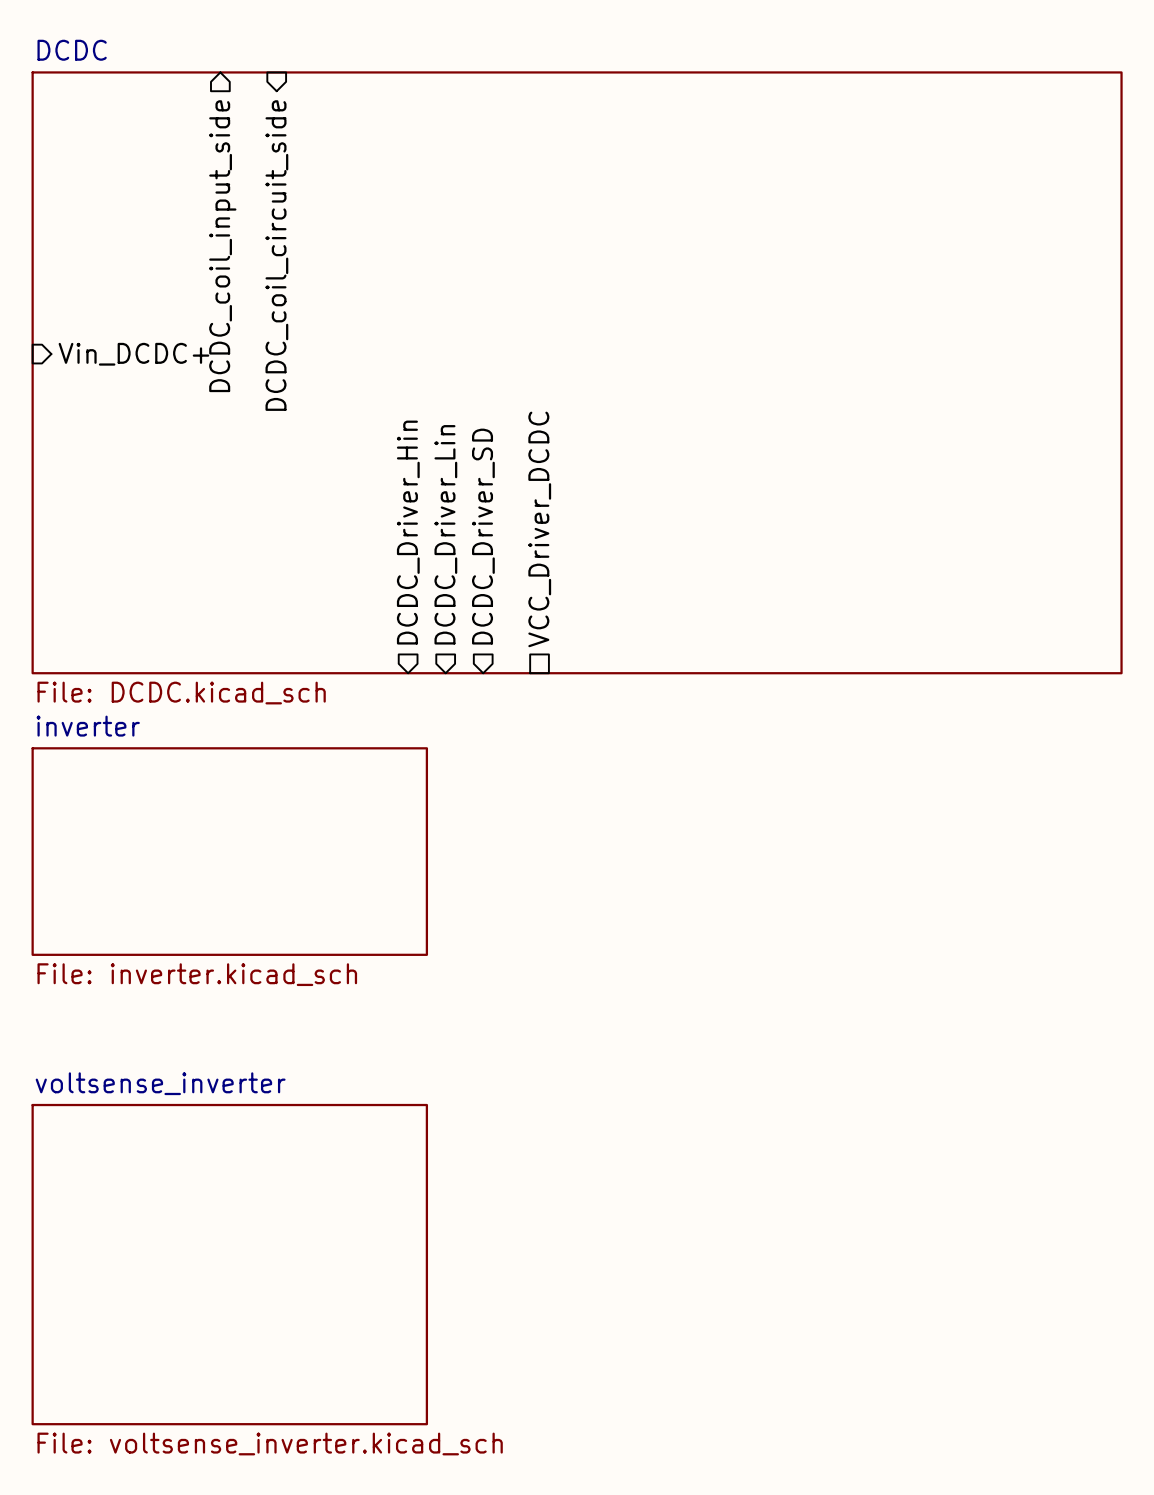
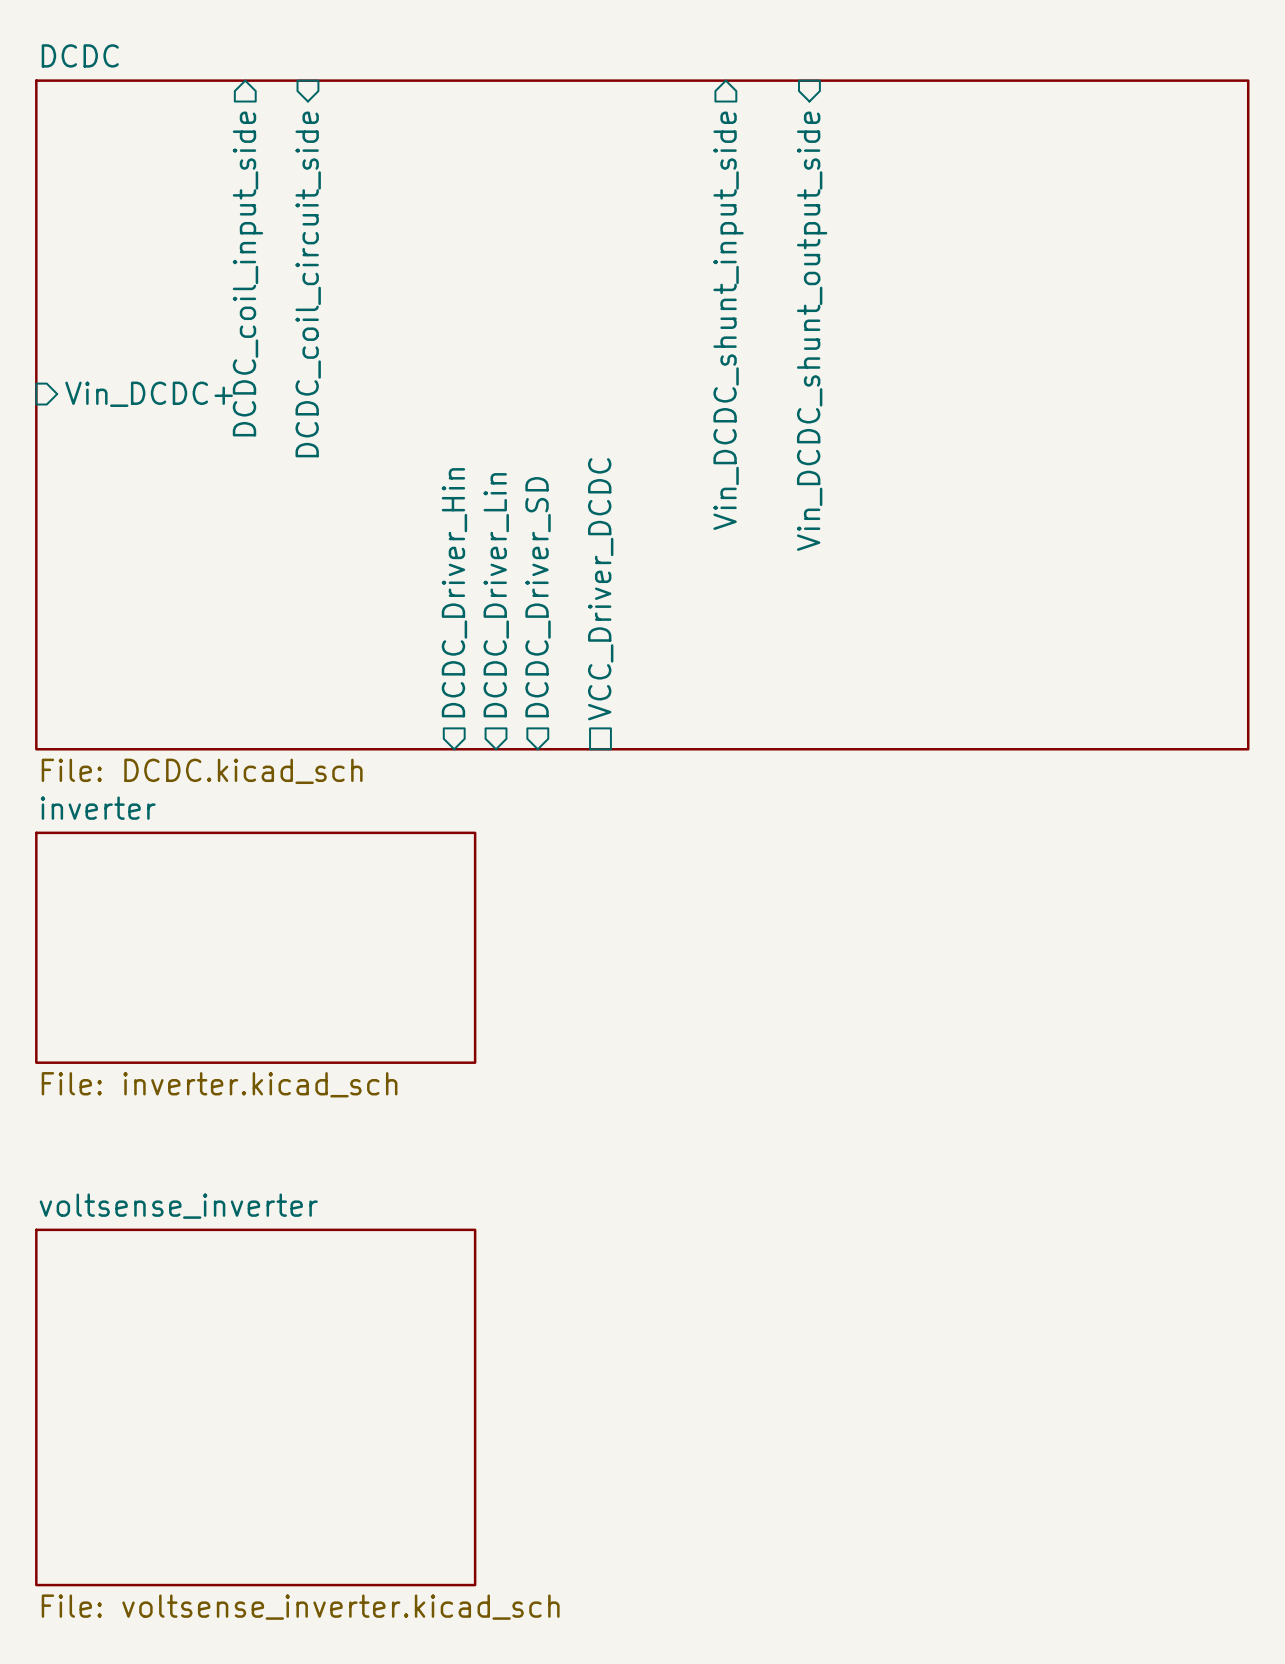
sheet pin: none -> Vin_DCDC_shunt_input_side (728, 320)
sheet pin: none -> Vin_DCDC_shunt_output_side (812, 331)

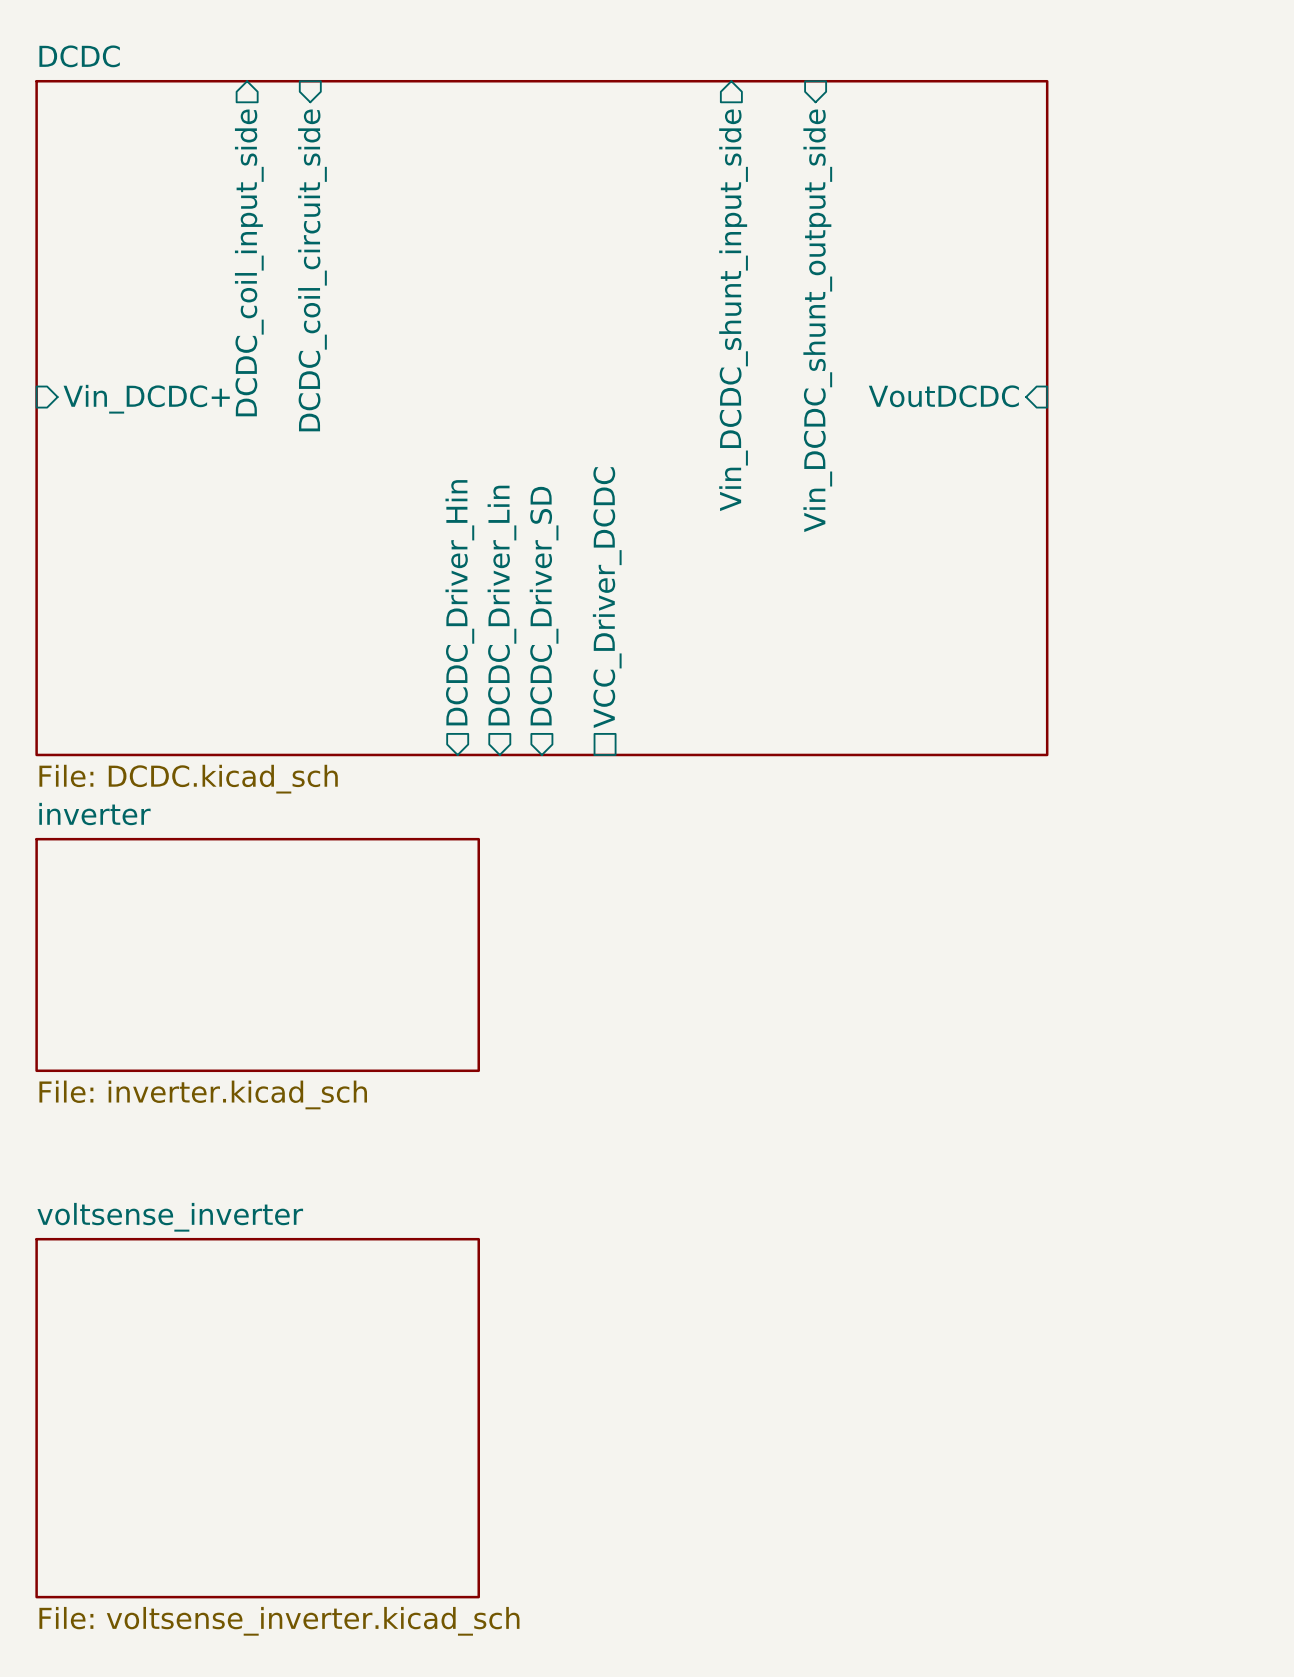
sheet pin: none -> VoutDCDC (943, 396)
sheet DCDC: none -> File: DCDC.kicad_sch (541, 418)
sheet DCDC: File: DCDC.kicad_sch (642, 414) -> none

